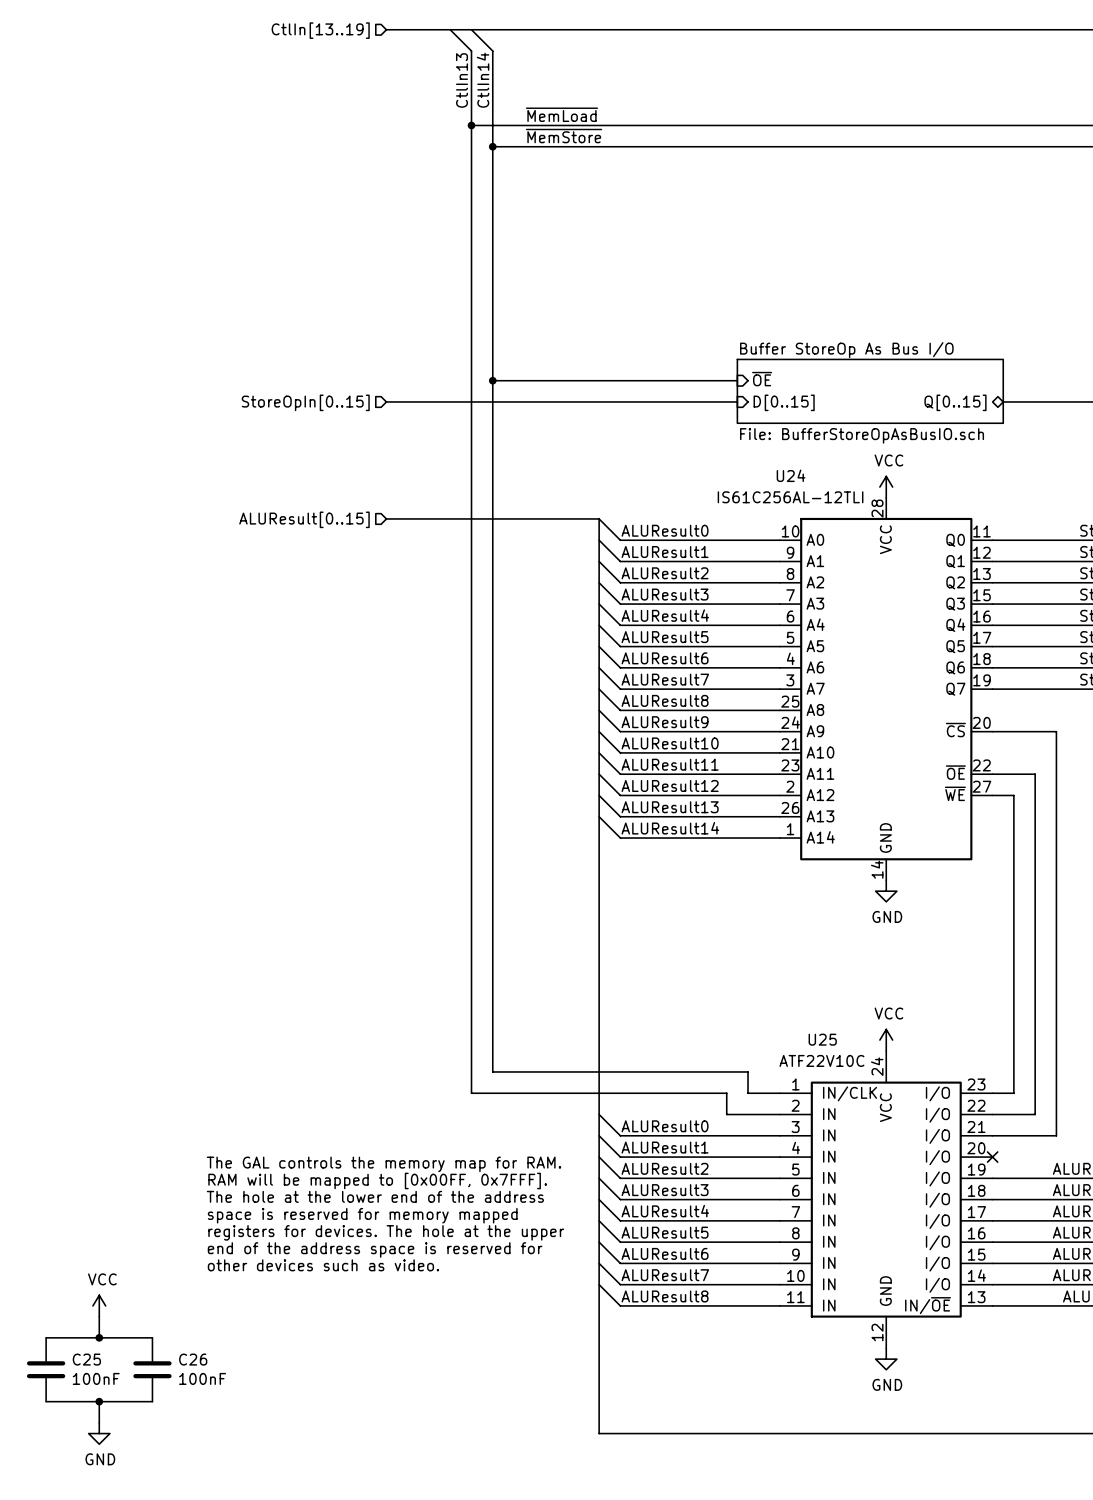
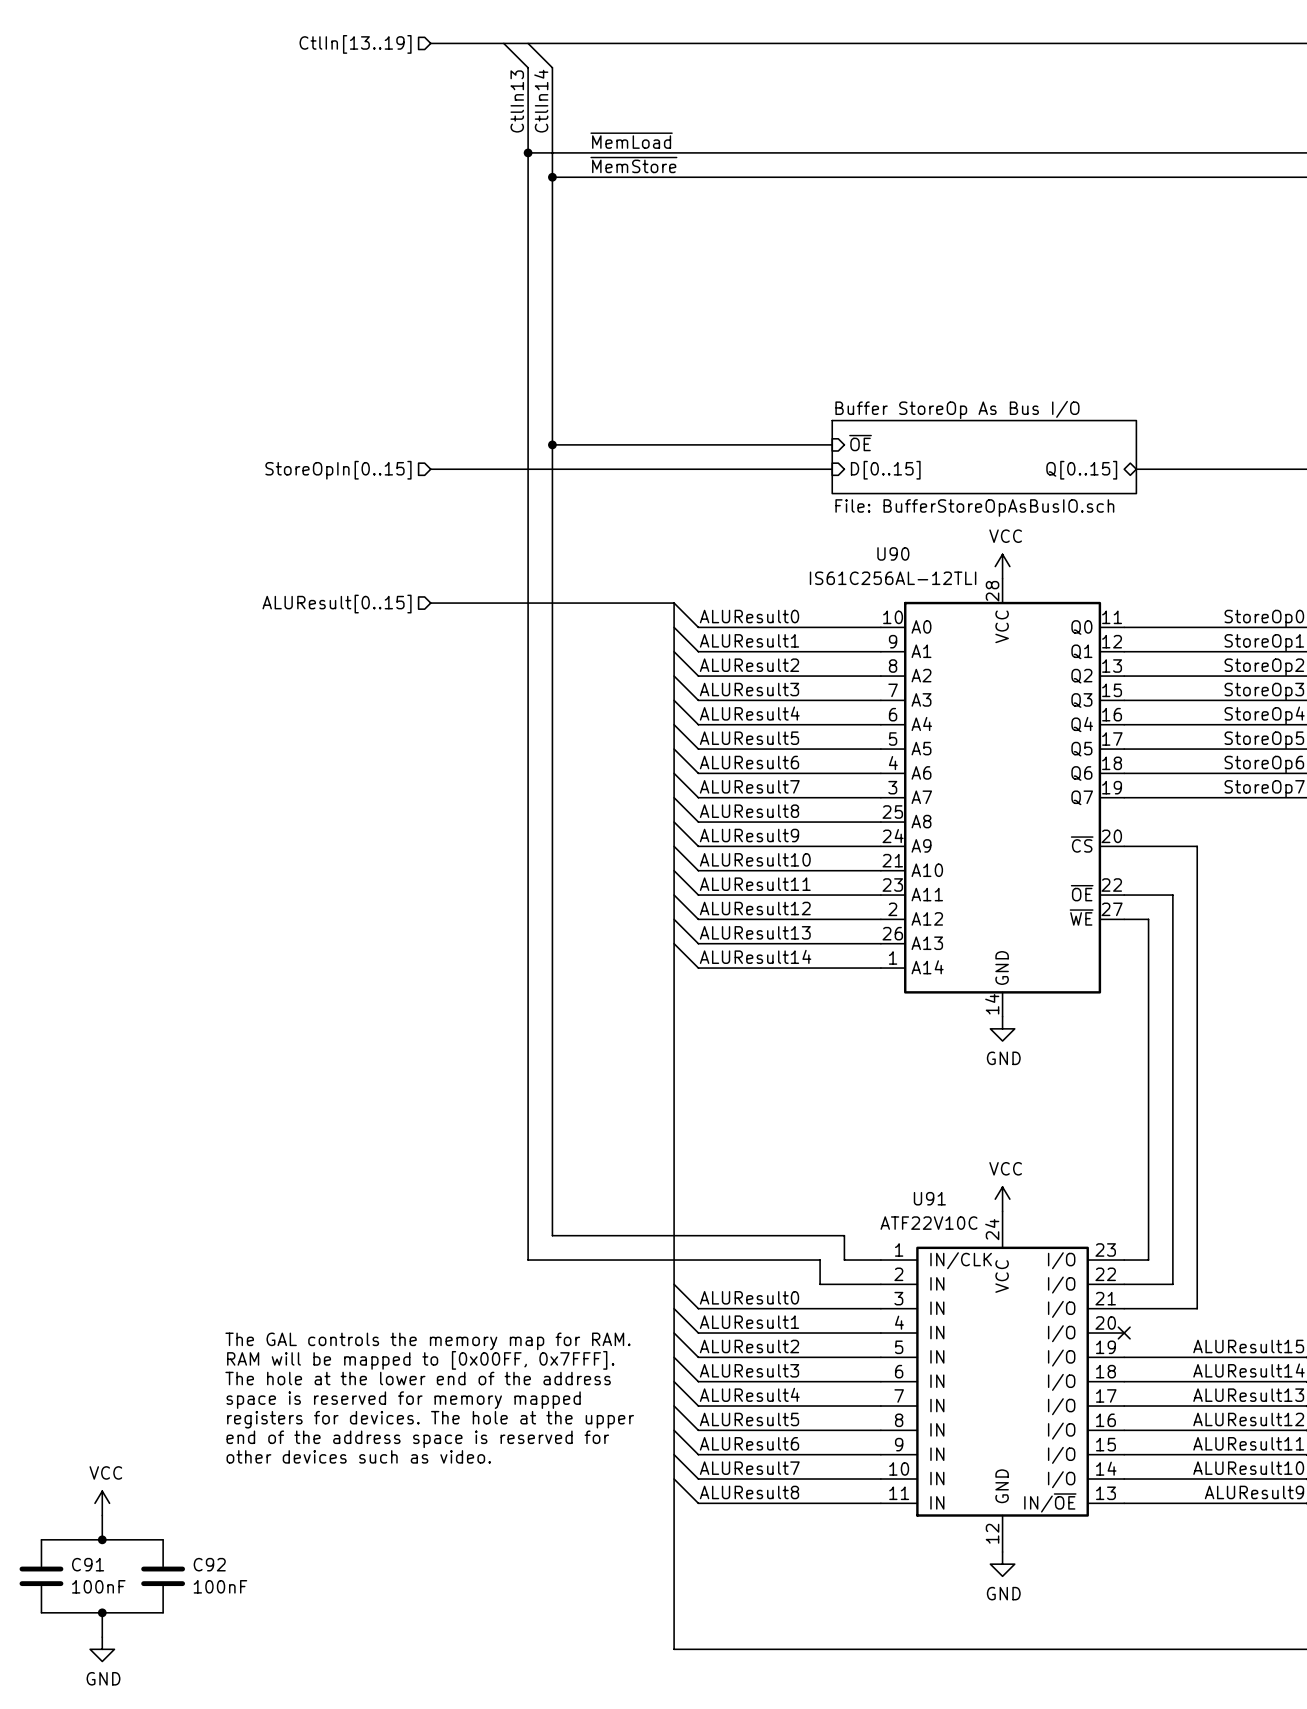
U24 name: U24 (791, 475) -> U90 (893, 553)
U25 name: U25 (822, 1039) -> U91 (929, 1198)
C25 name: C25 (86, 1359) -> C91 (88, 1564)
C26 name: C26 (193, 1359) -> C92 (209, 1564)

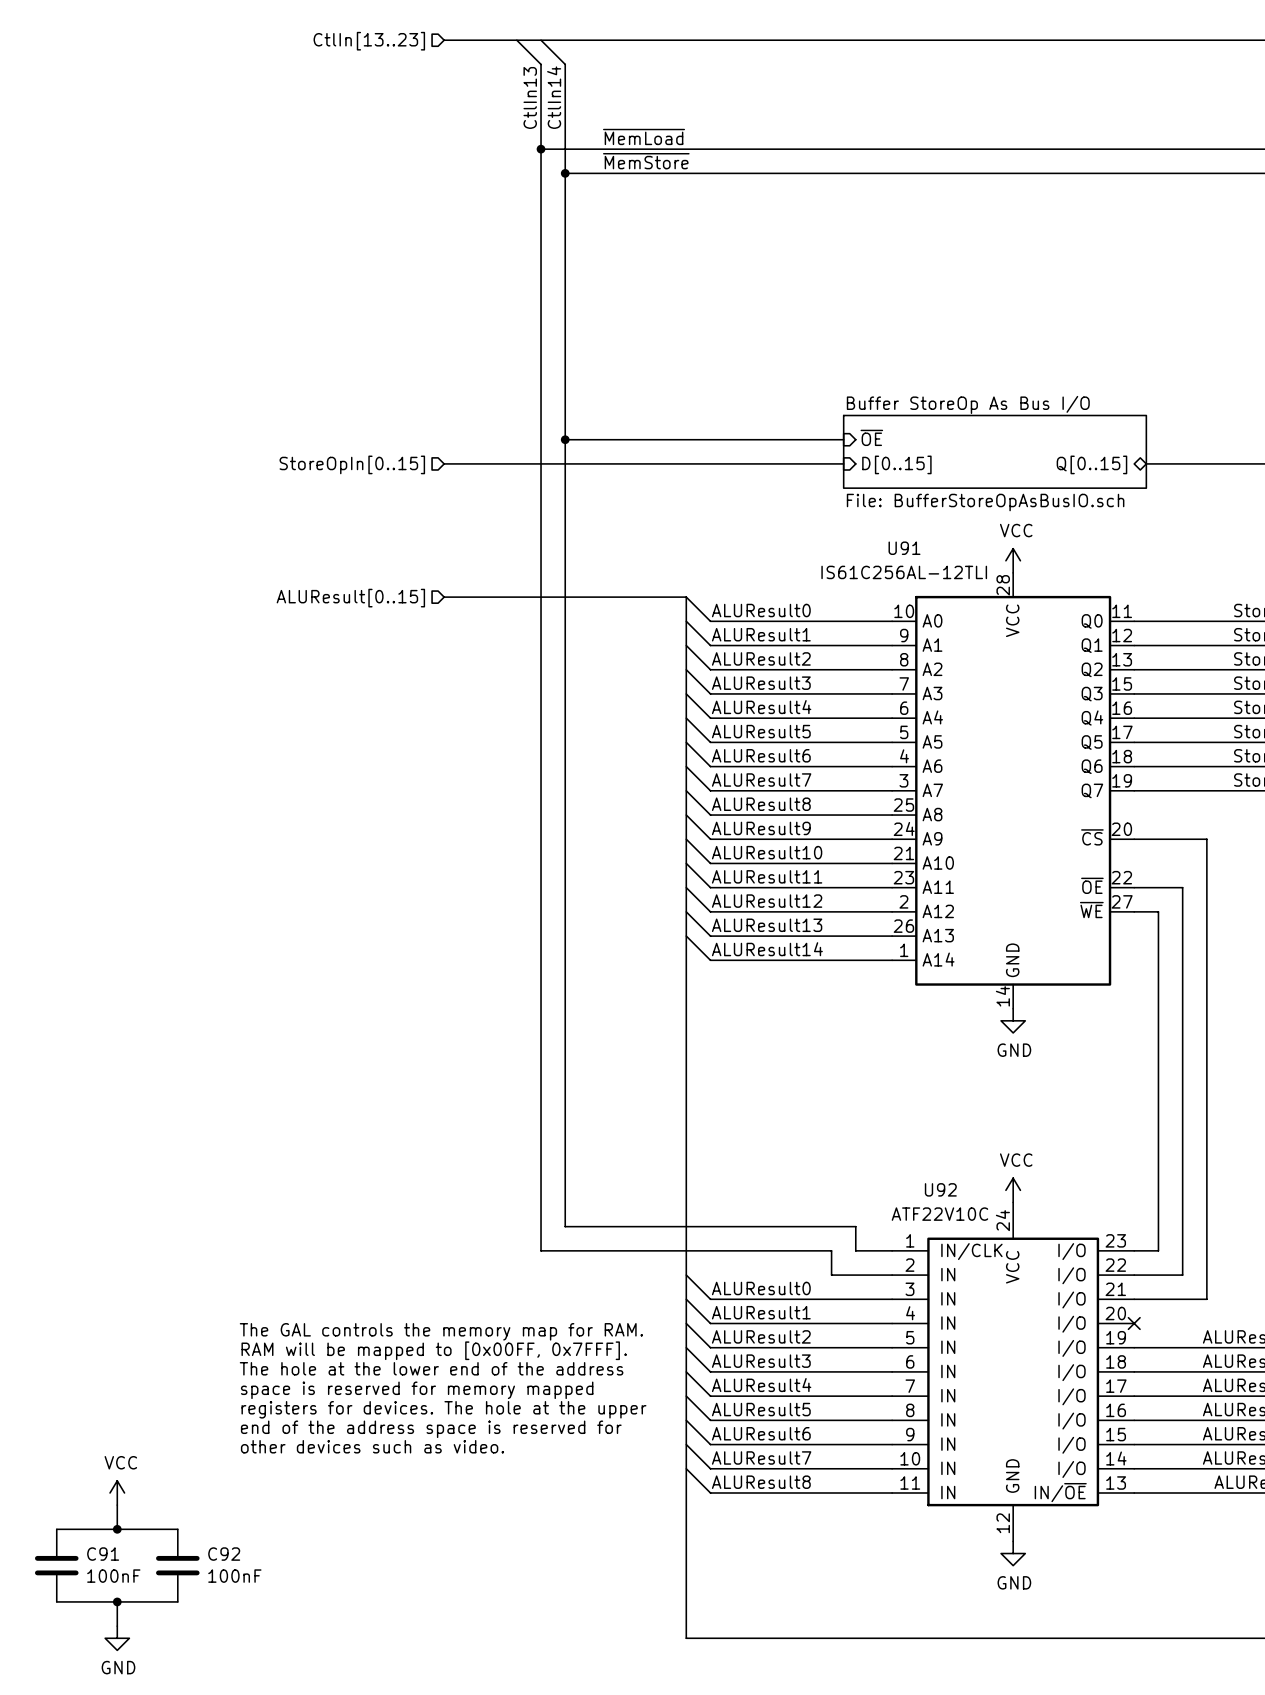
hierarchical label: CtlIn[13..19] (355, 44) -> CtlIn[13..23] (369, 41)
U90 name: U90 (893, 553) -> U91 (904, 548)
U91 name: U91 (929, 1198) -> U92 (940, 1189)

